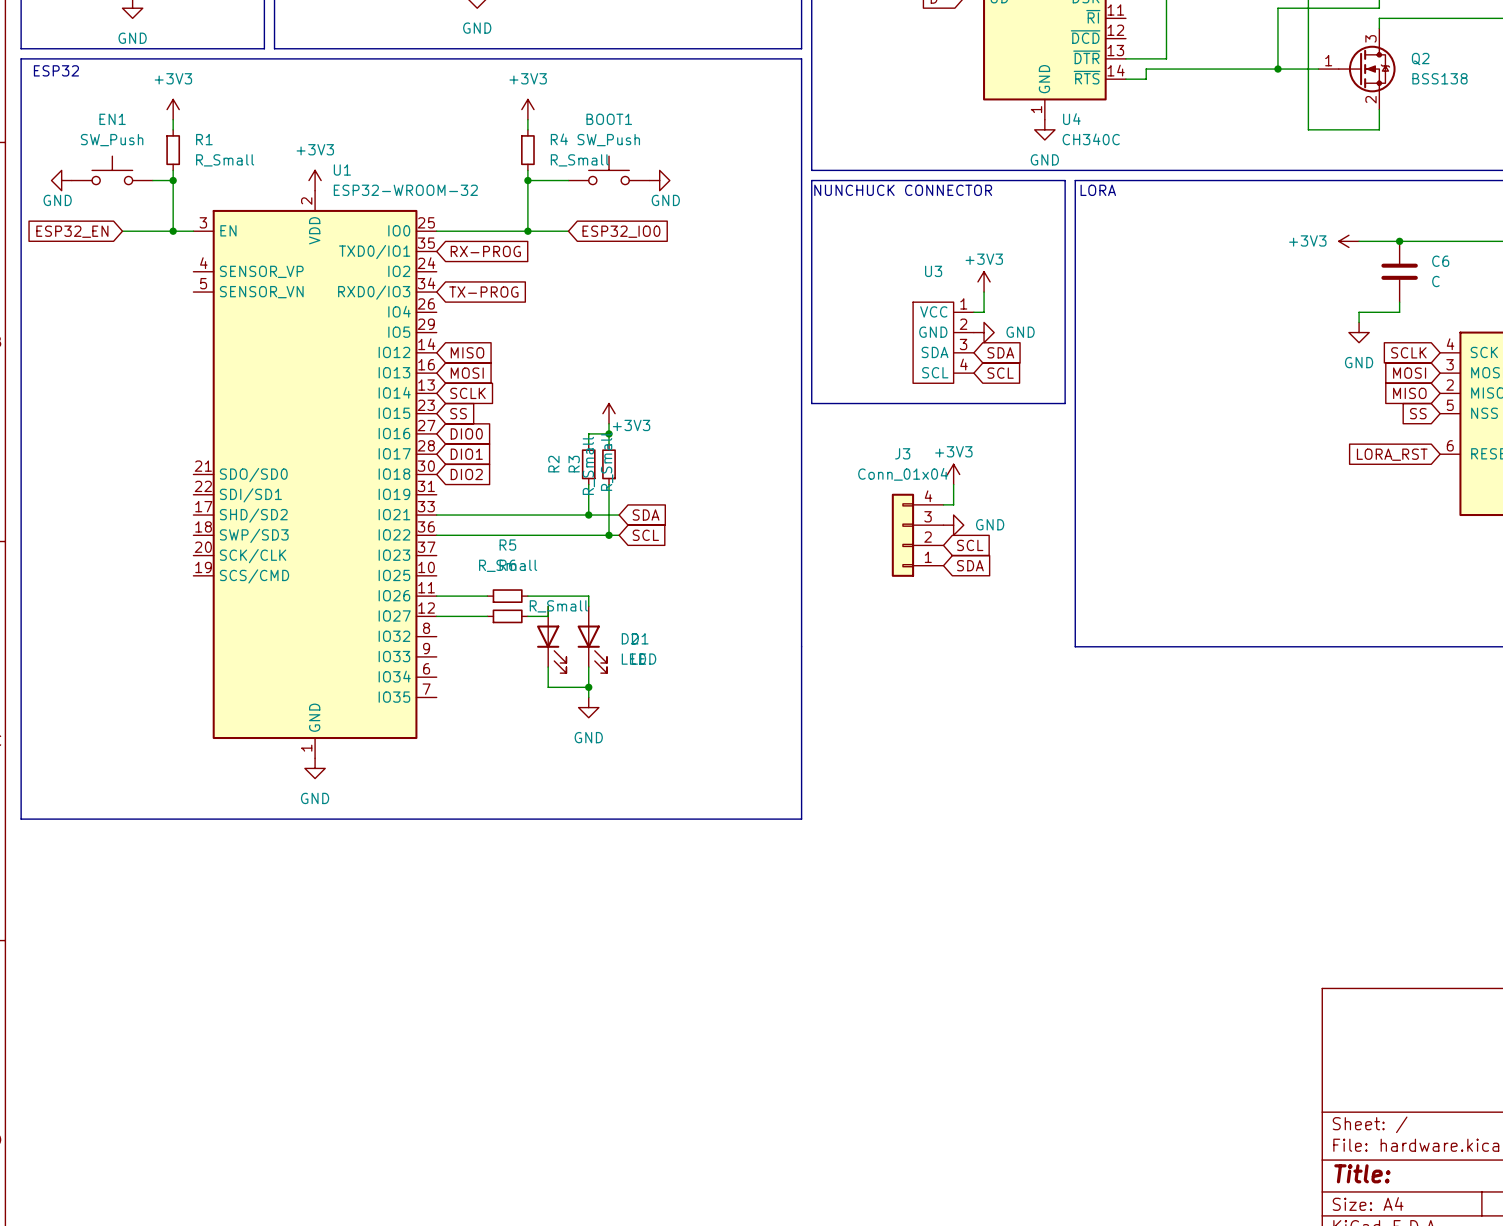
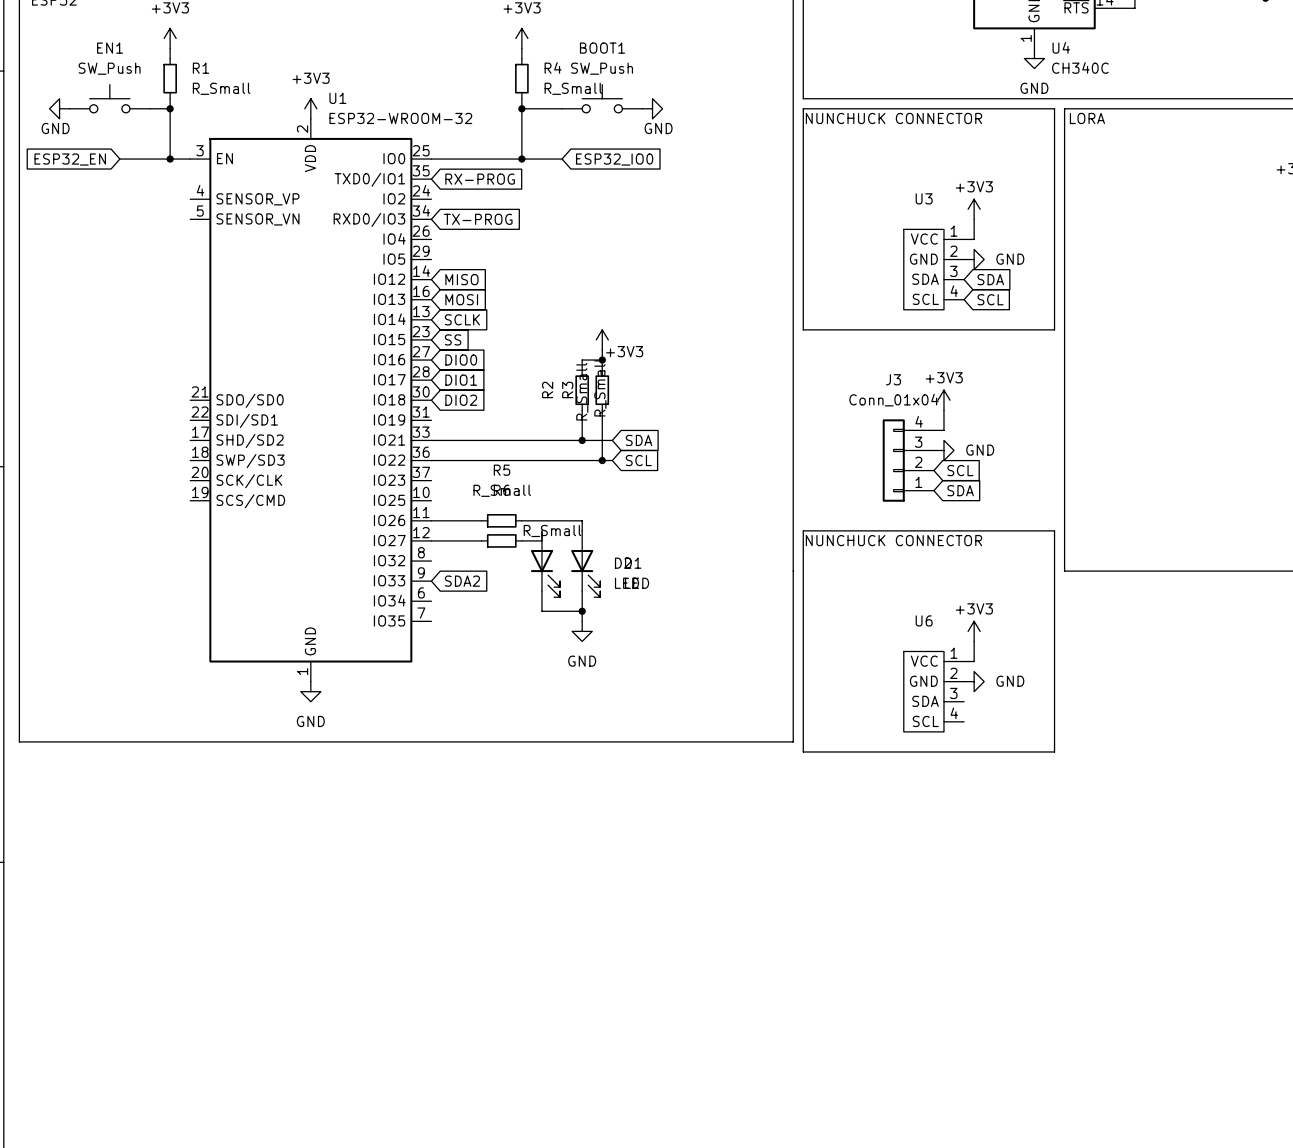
line: none -> (803, 530) (1054, 530) (1054, 751) (803, 751) (803, 530)
text: none -> NUNCHUCK CONNECTOR (893, 540)
global label: none -> SDA2 (462, 581)
power symbol: none -> +3V3 (974, 631)
wire: none -> (974, 641) (974, 661) (964, 661)
power symbol: none -> GND (974, 681)
U6: none -> (933, 691)

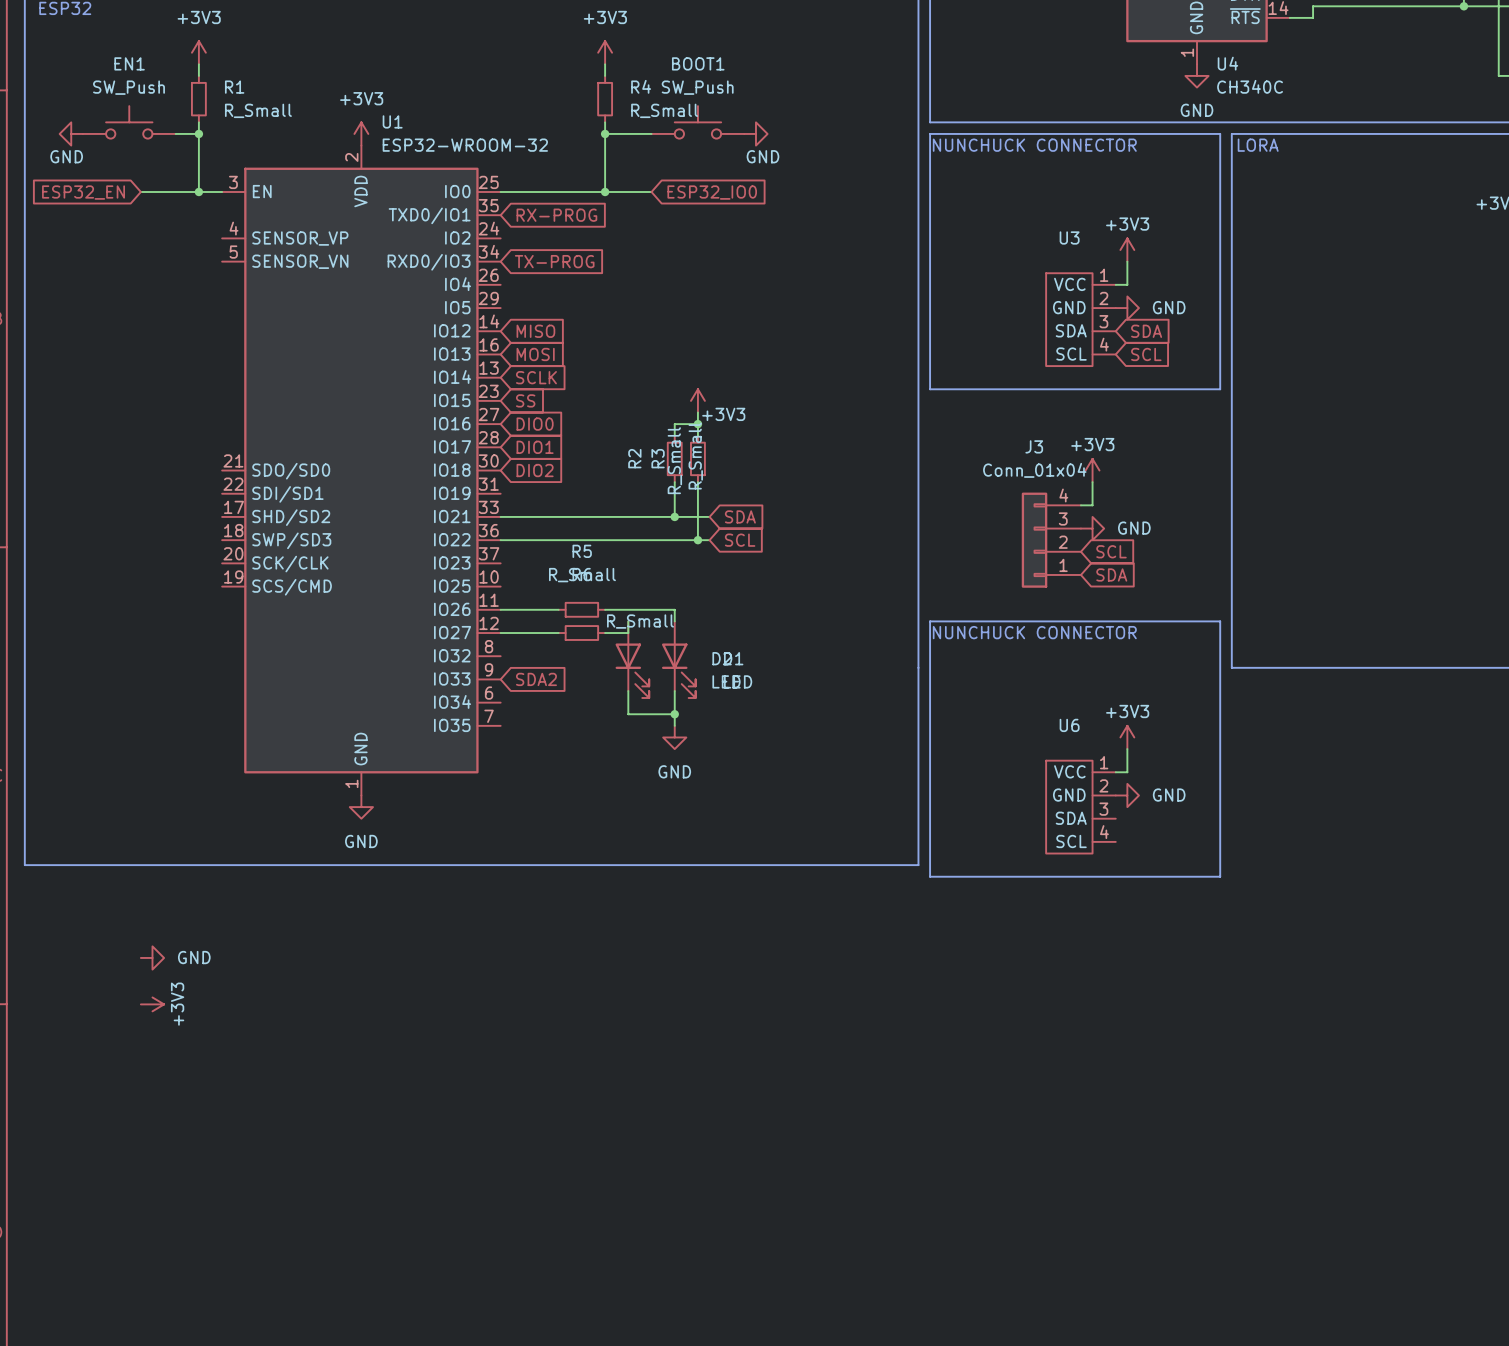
power symbol: none -> GND (152, 957)
power symbol: none -> +3V3 (152, 1004)

